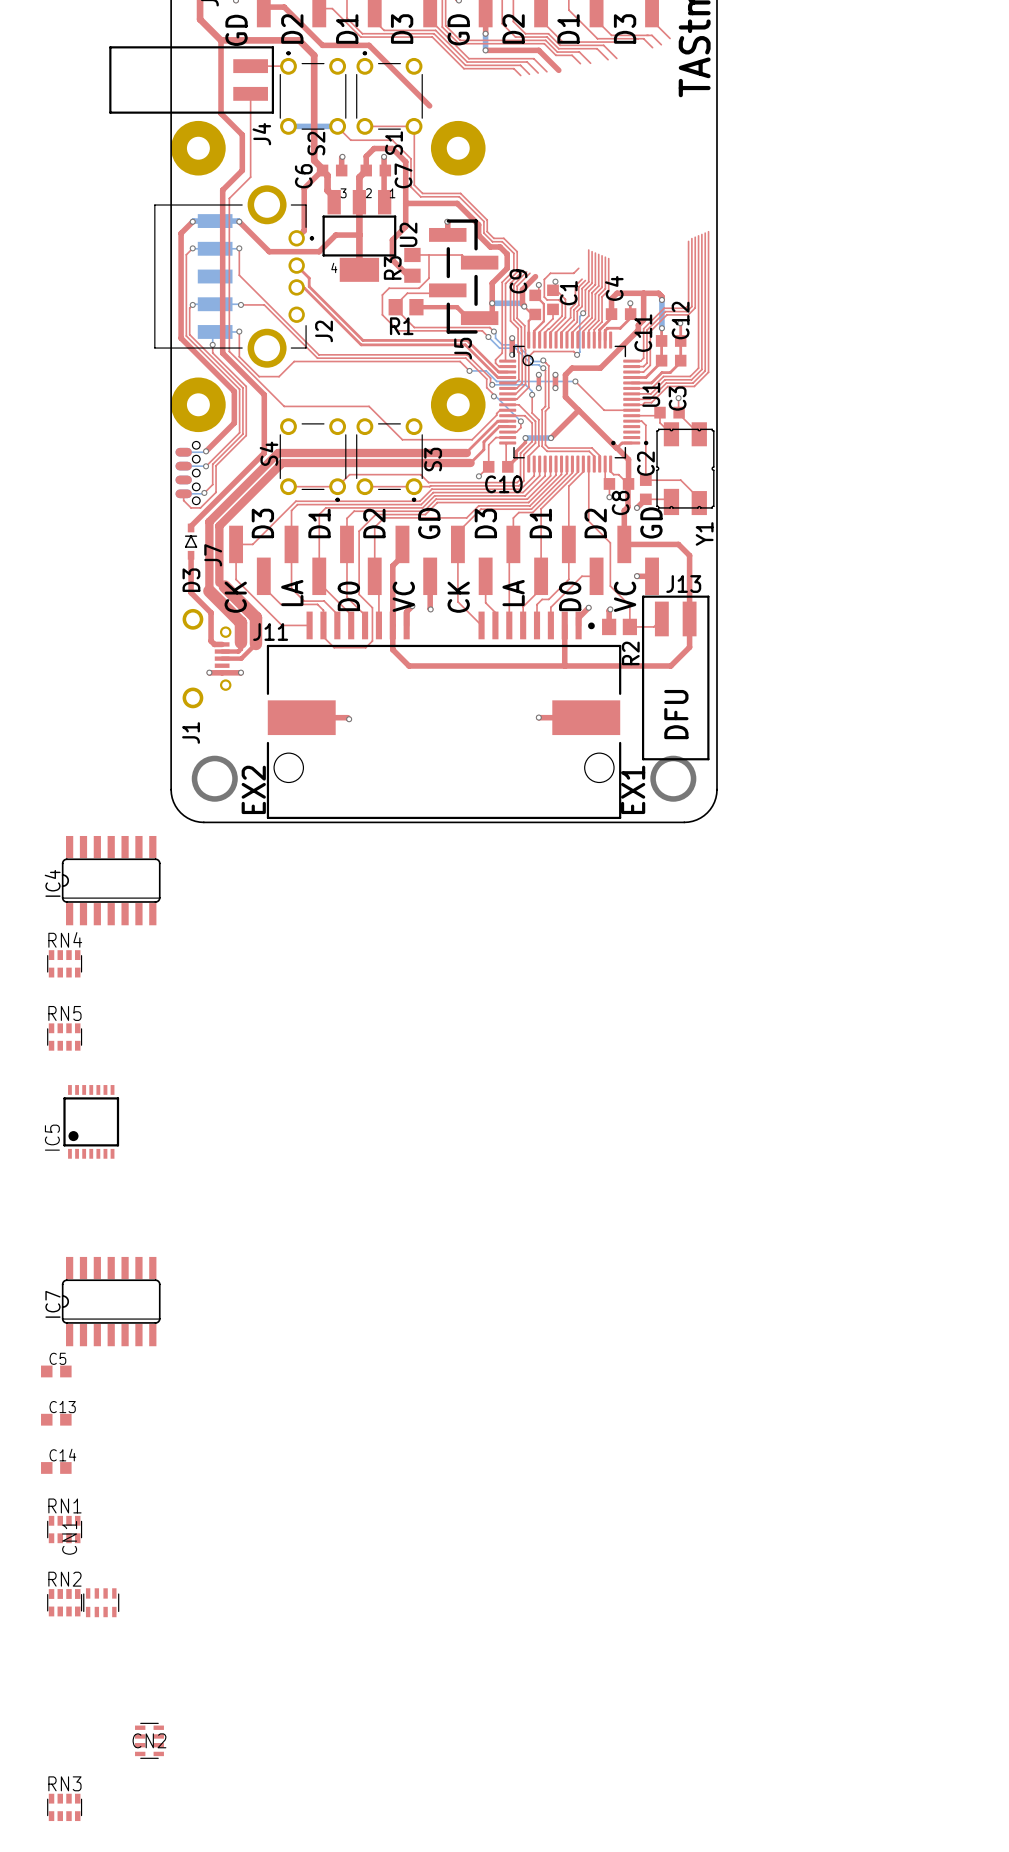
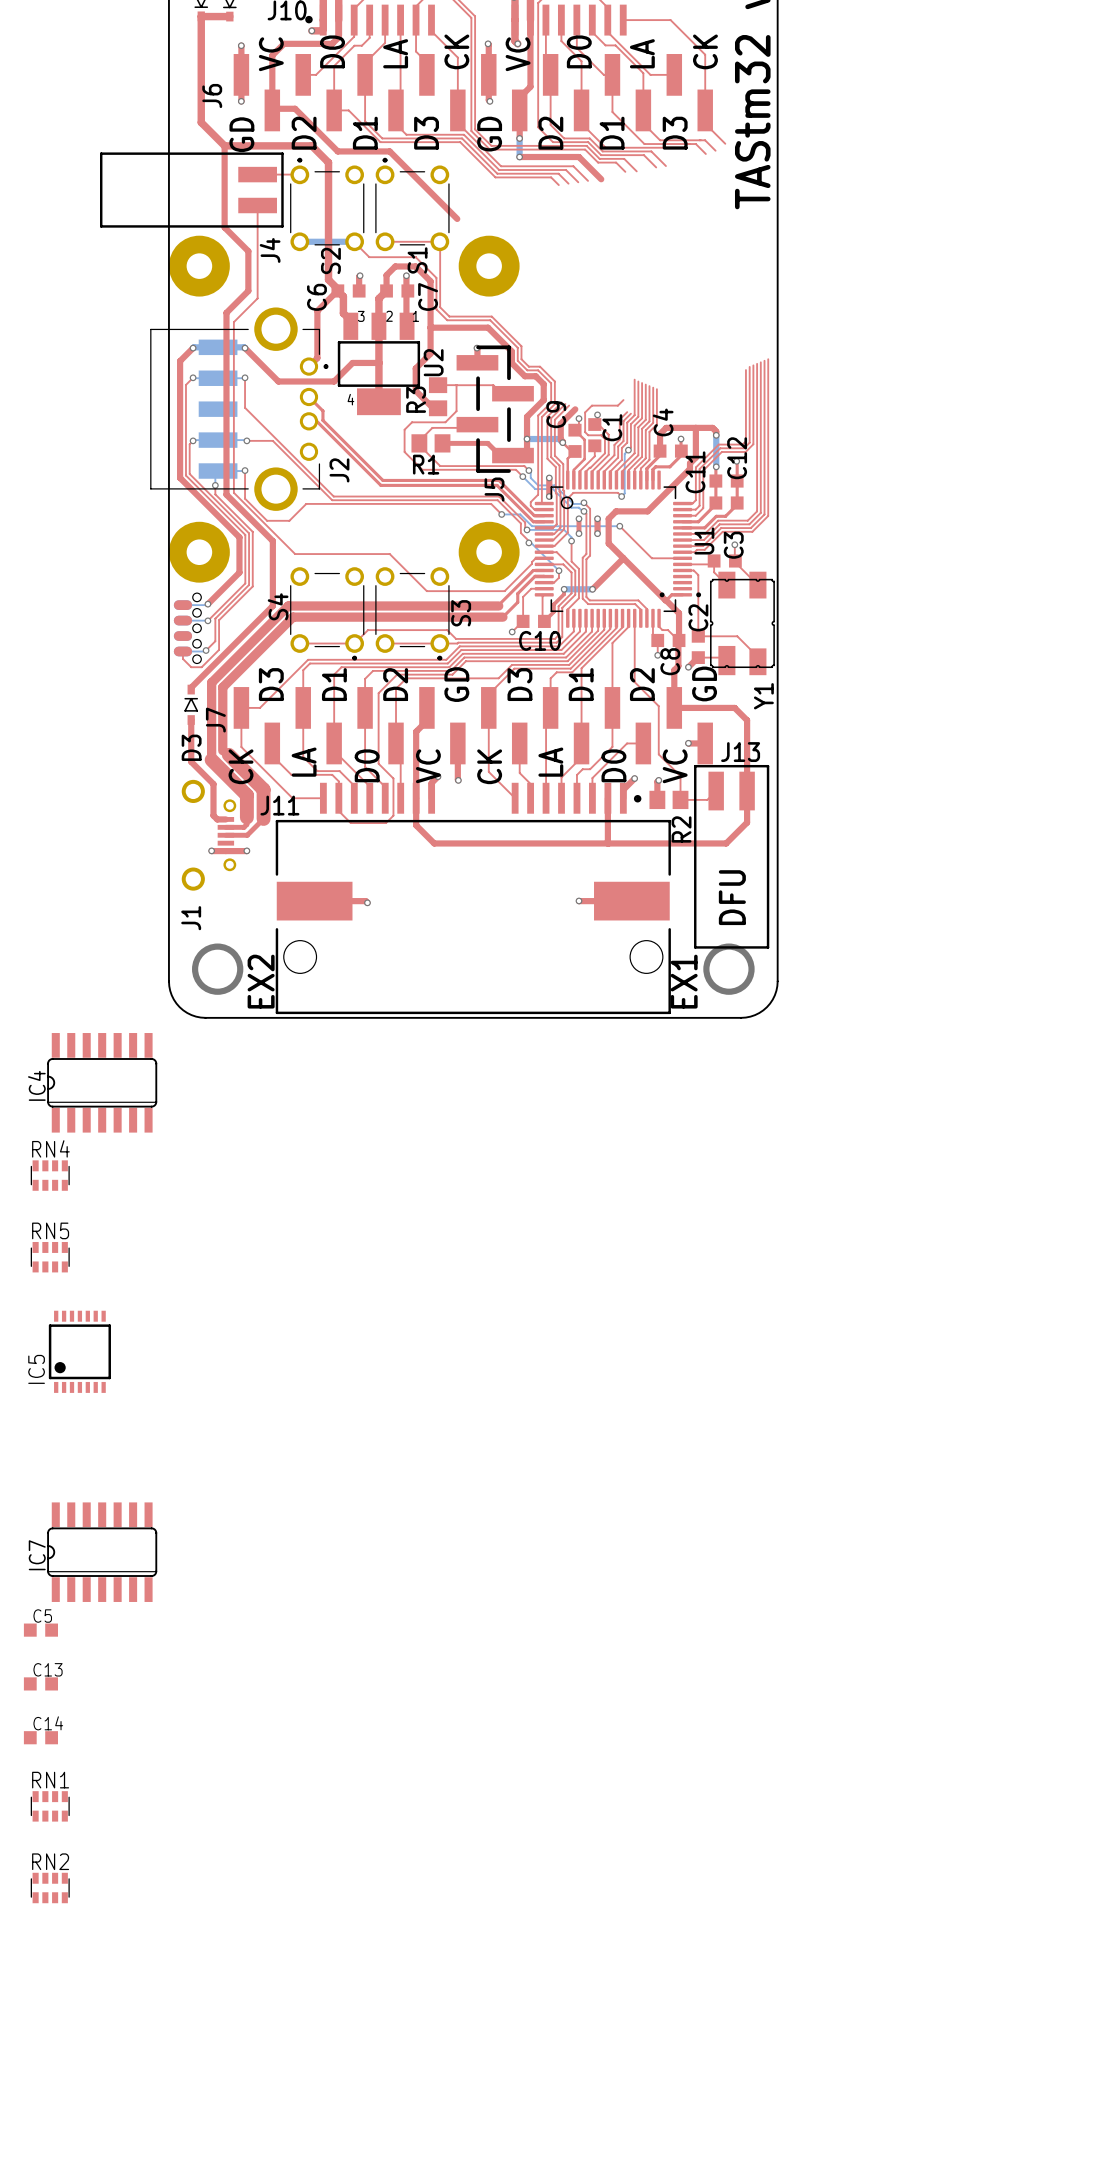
CN1: (101, 1602) -> none
CN2: (149, 1740) -> none
RN3: (64, 1807) -> none

